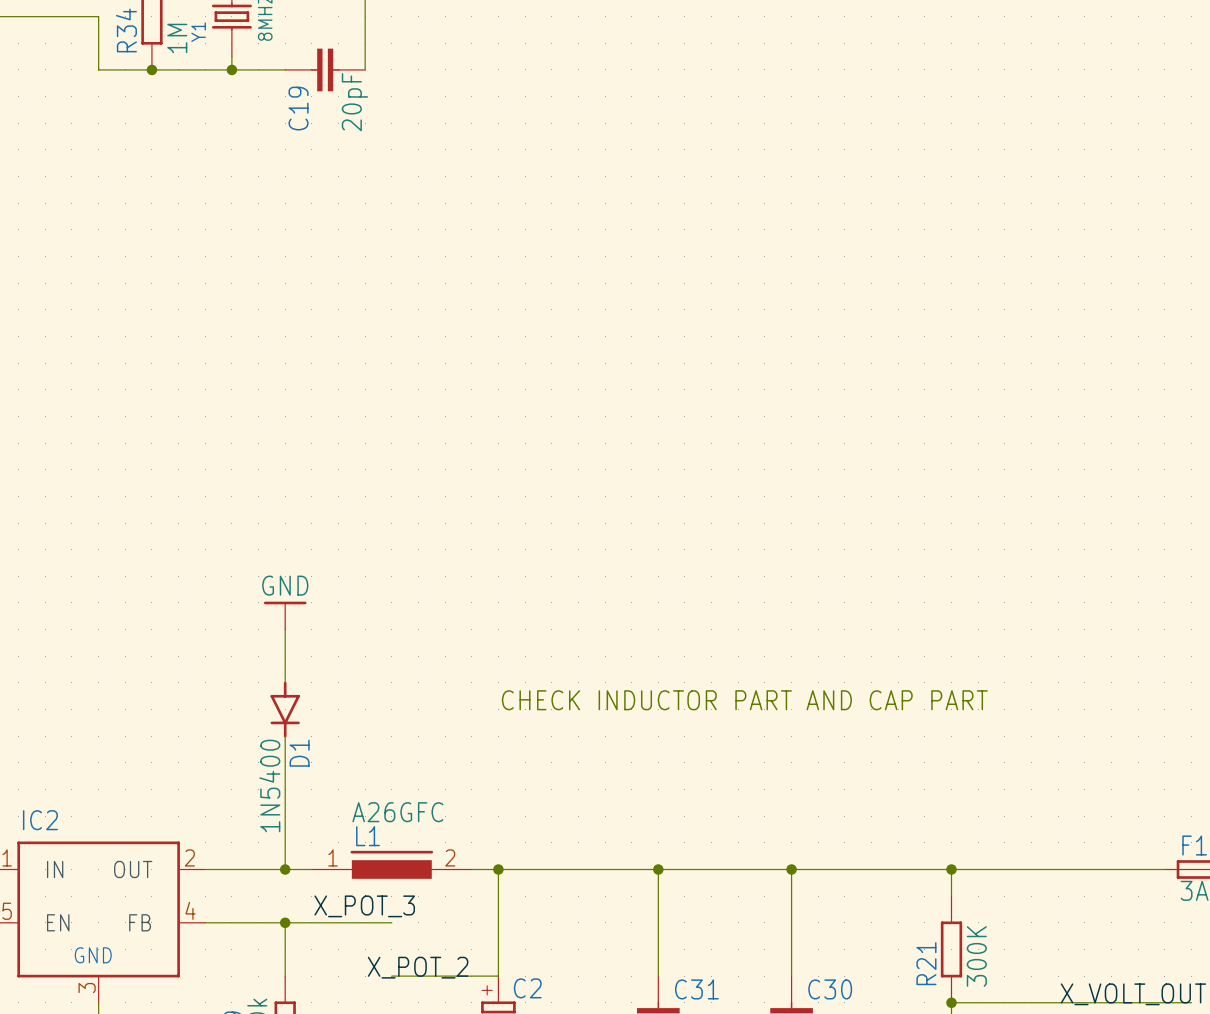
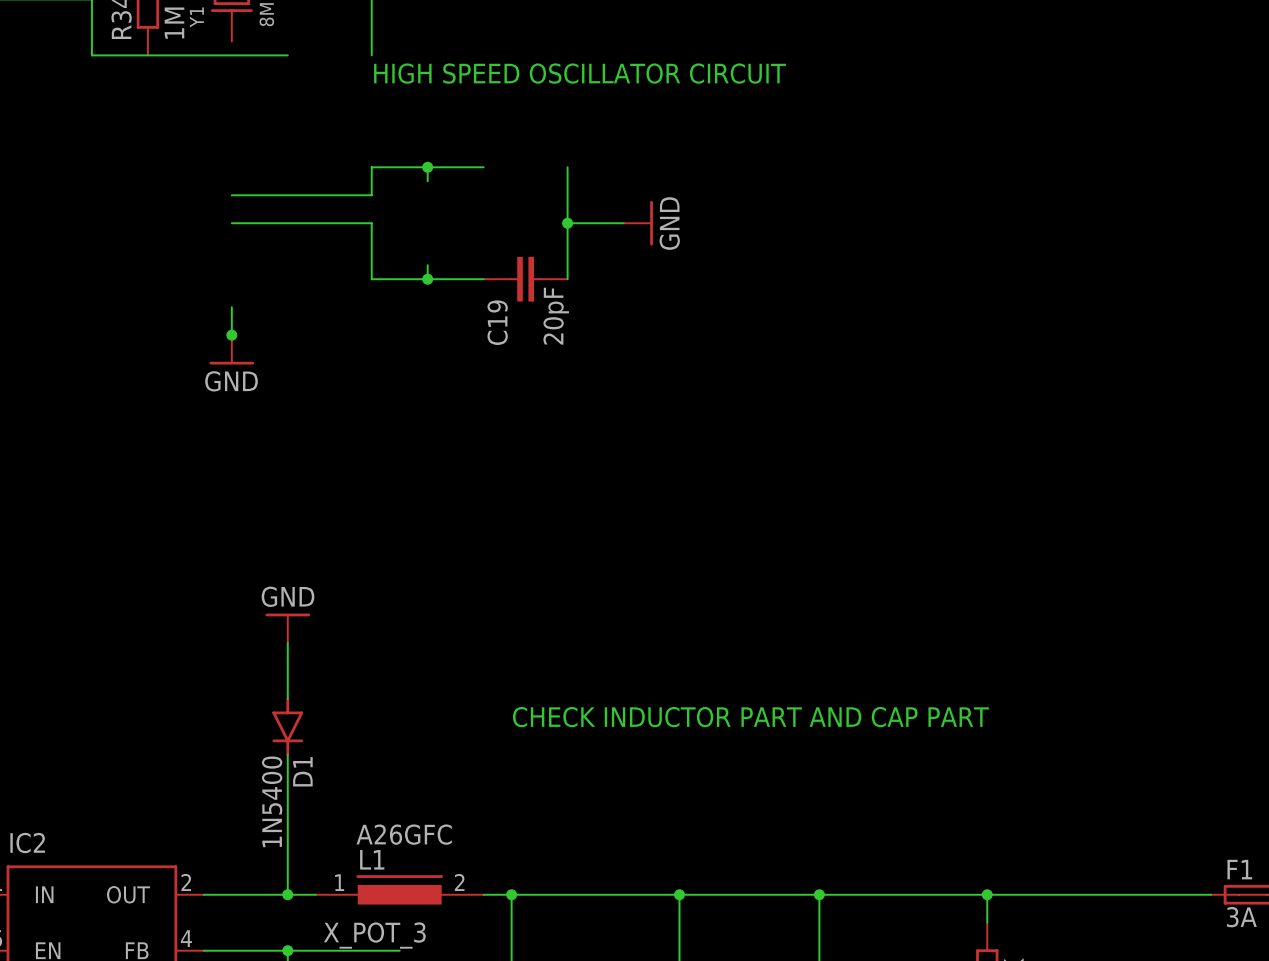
wire: (231, 56) (231, 69) -> (427, 167) (427, 181)
junction: (151, 69) -> none
junction: (231, 69) -> none
C19 position: (325, 69) -> (525, 279)
text: none -> HIGH SPEED OSCILLATOR CIRCUIT (580, 73)
junction: none -> (427, 167)
wire: none -> (483, 167) (371, 167) (371, 195) (231, 195)
wire: none -> (567, 167) (567, 279)
wire: none -> (231, 223) (371, 223) (371, 279) (483, 279)
wire: none -> (567, 223) (623, 223)
junction: none -> (567, 223)
power symbol: none -> GND (638, 223)
wire: none -> (427, 265) (427, 279)
junction: none -> (427, 279)
wire: none -> (231, 307) (231, 335)
junction: none -> (231, 335)
power symbol: none -> GND (231, 349)

